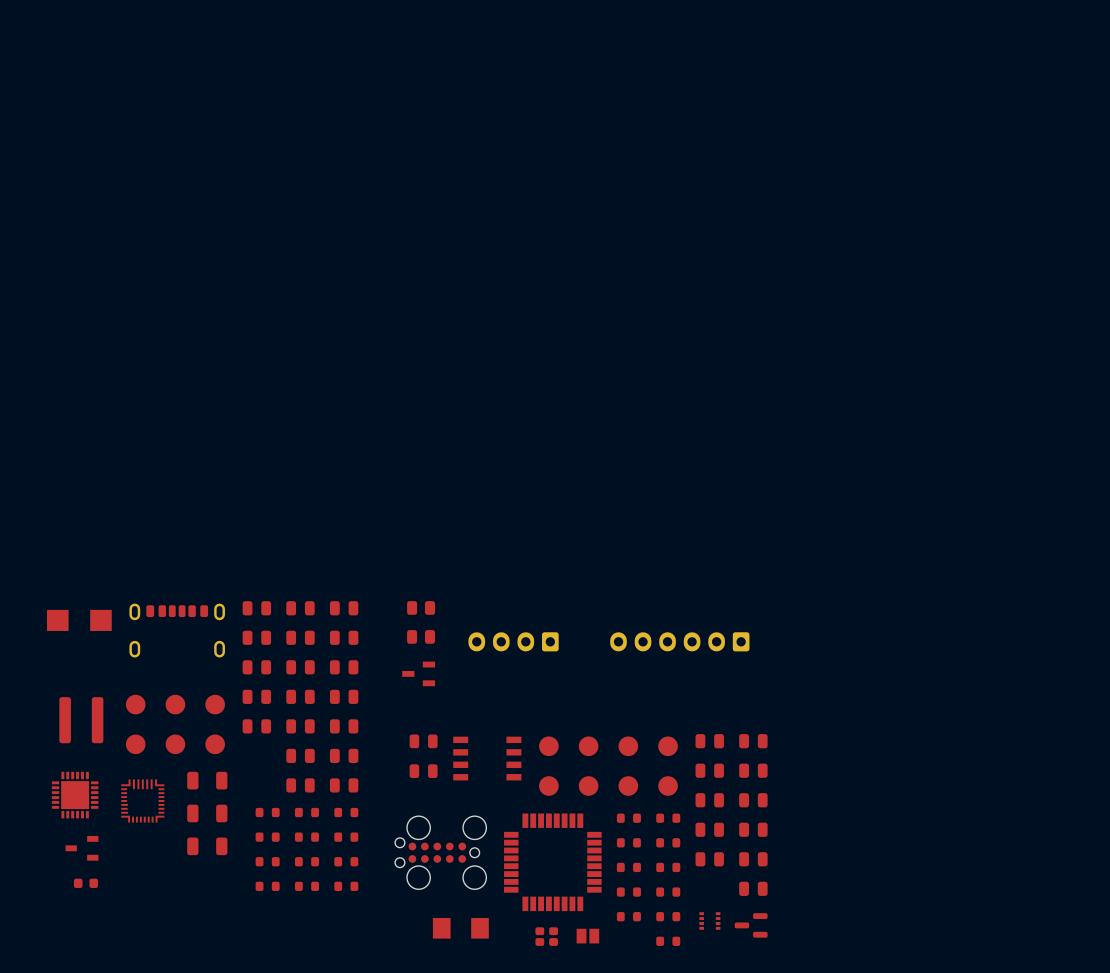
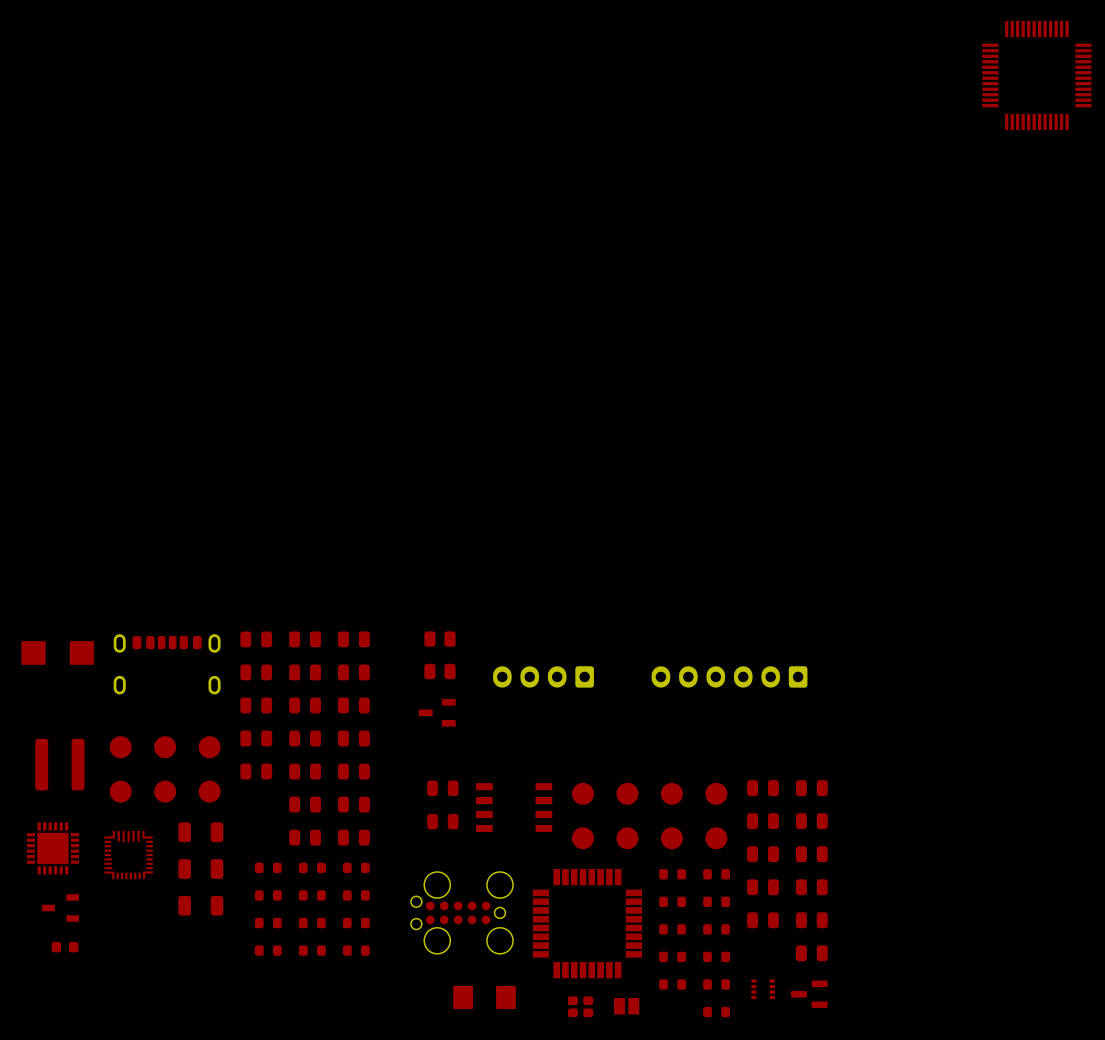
part: none -> (1036, 75)

